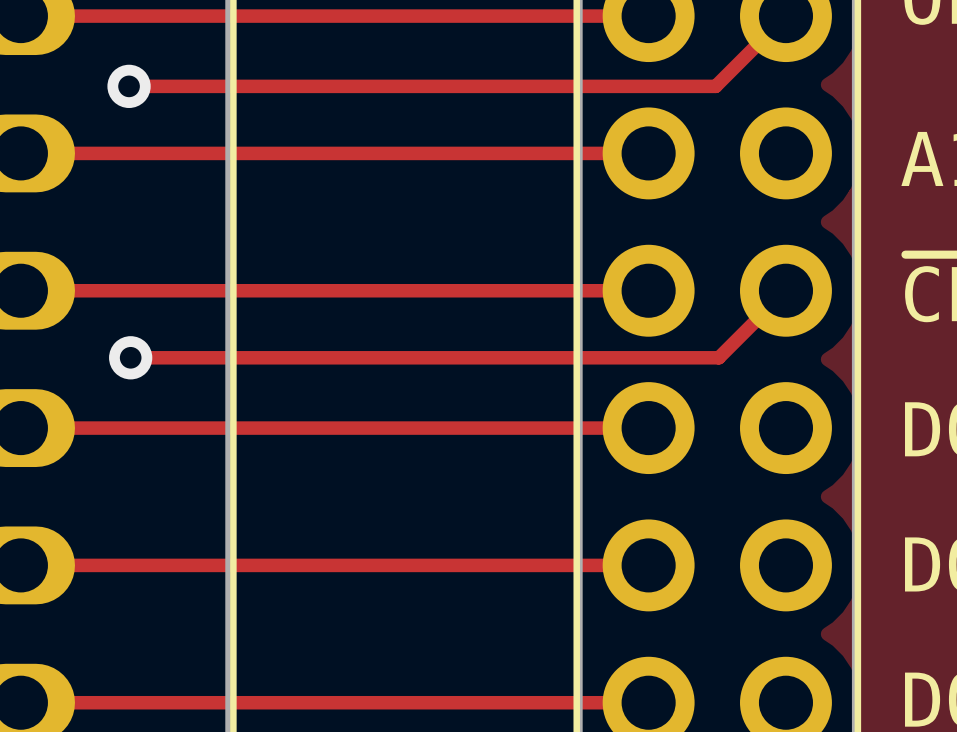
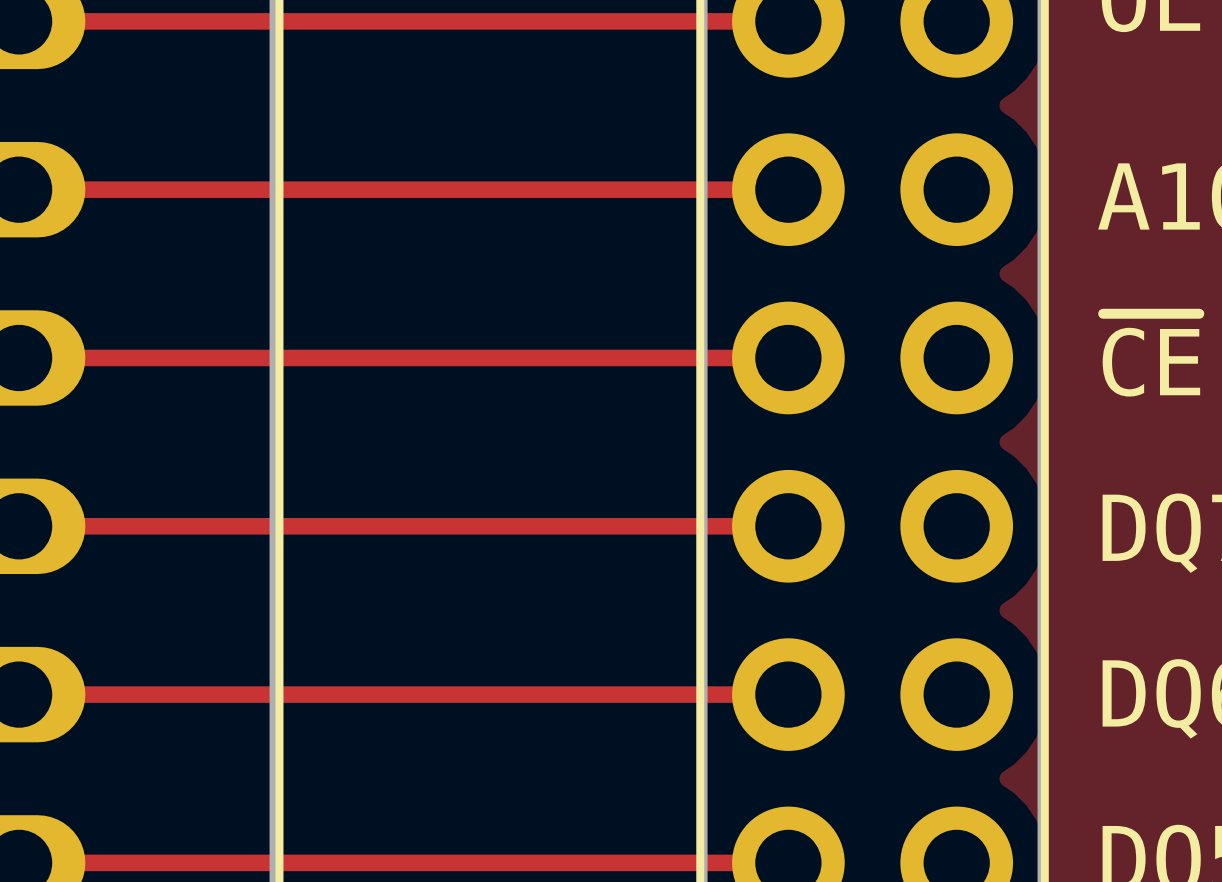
track: (785, 16) (715, 86) (129, 86) -> none
via: (129, 86) -> none
track: (785, 290) (718, 357) (130, 357) -> none
via: (130, 357) -> none

